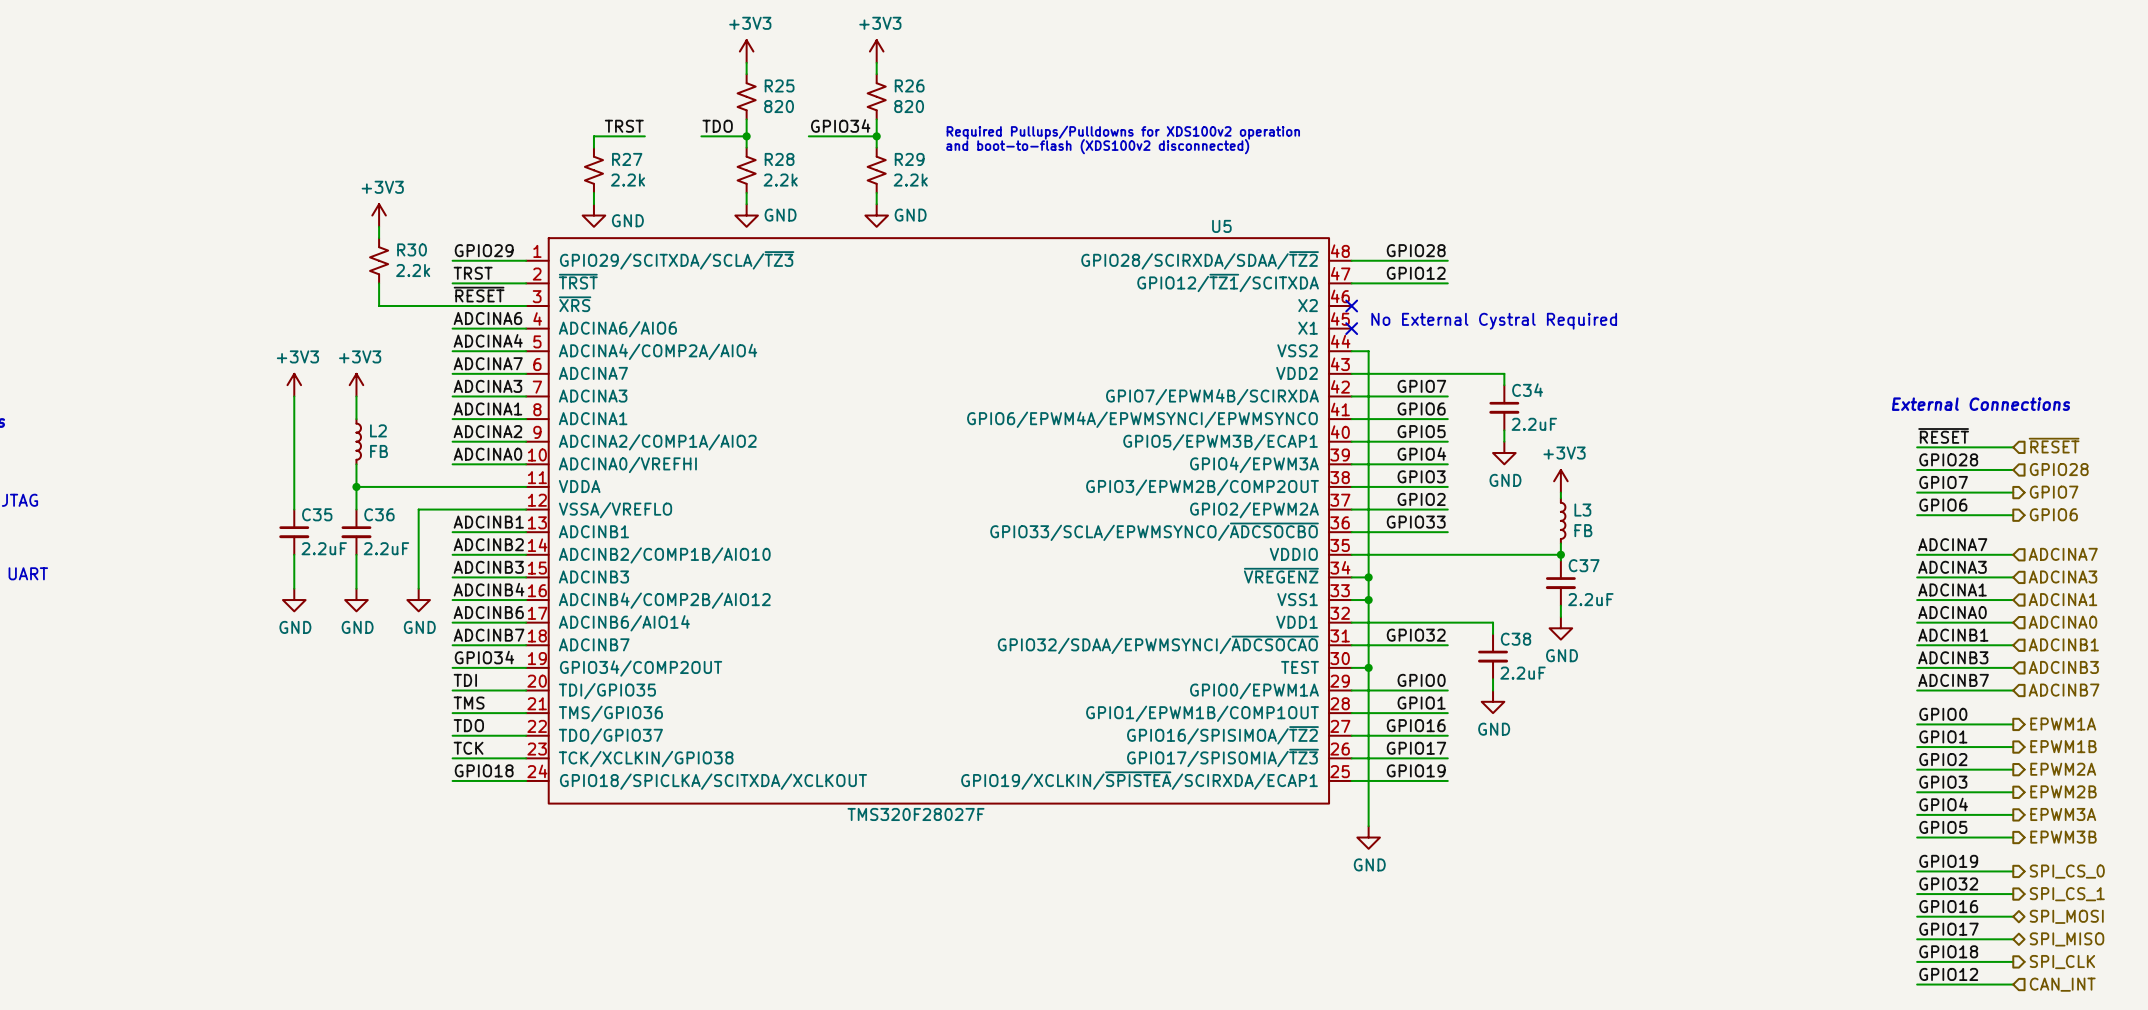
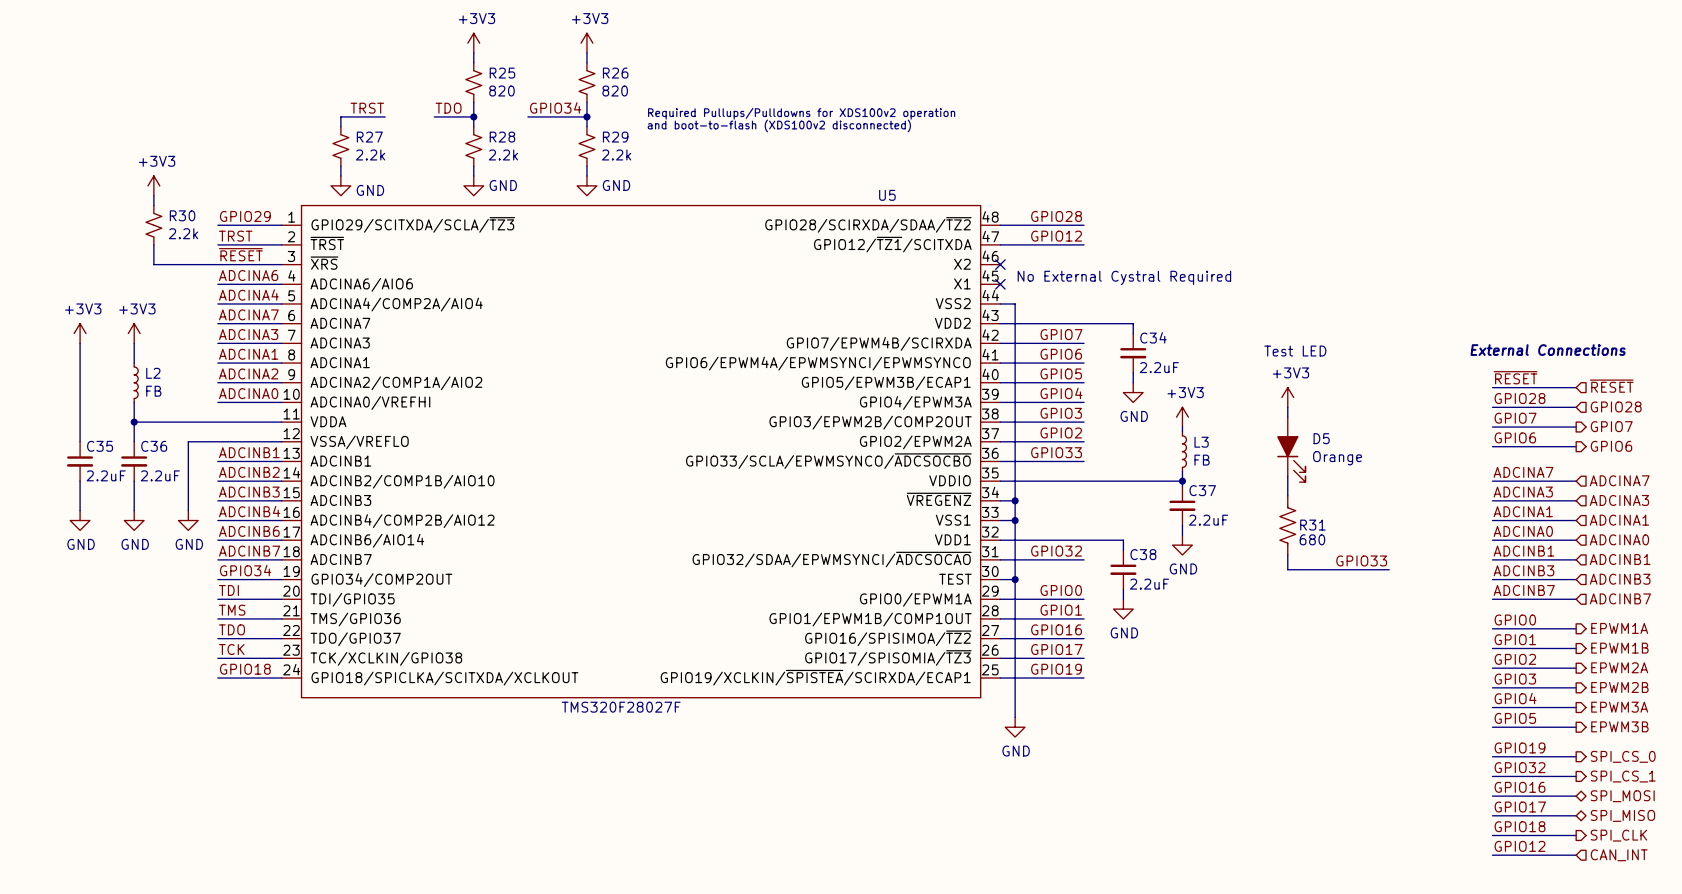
text: none -> Test LED (1295, 351)
power symbol: none -> +3V3 (1287, 397)
wire: none -> (1287, 407) (1287, 417)
D5: none -> Orange (1291, 449)
wire: none -> (1287, 476) (1287, 495)
R31: none -> 680 (1287, 525)
wire: none -> (1287, 554) (1287, 569) (1389, 569)
label: none -> GPIO33 (1361, 560)

